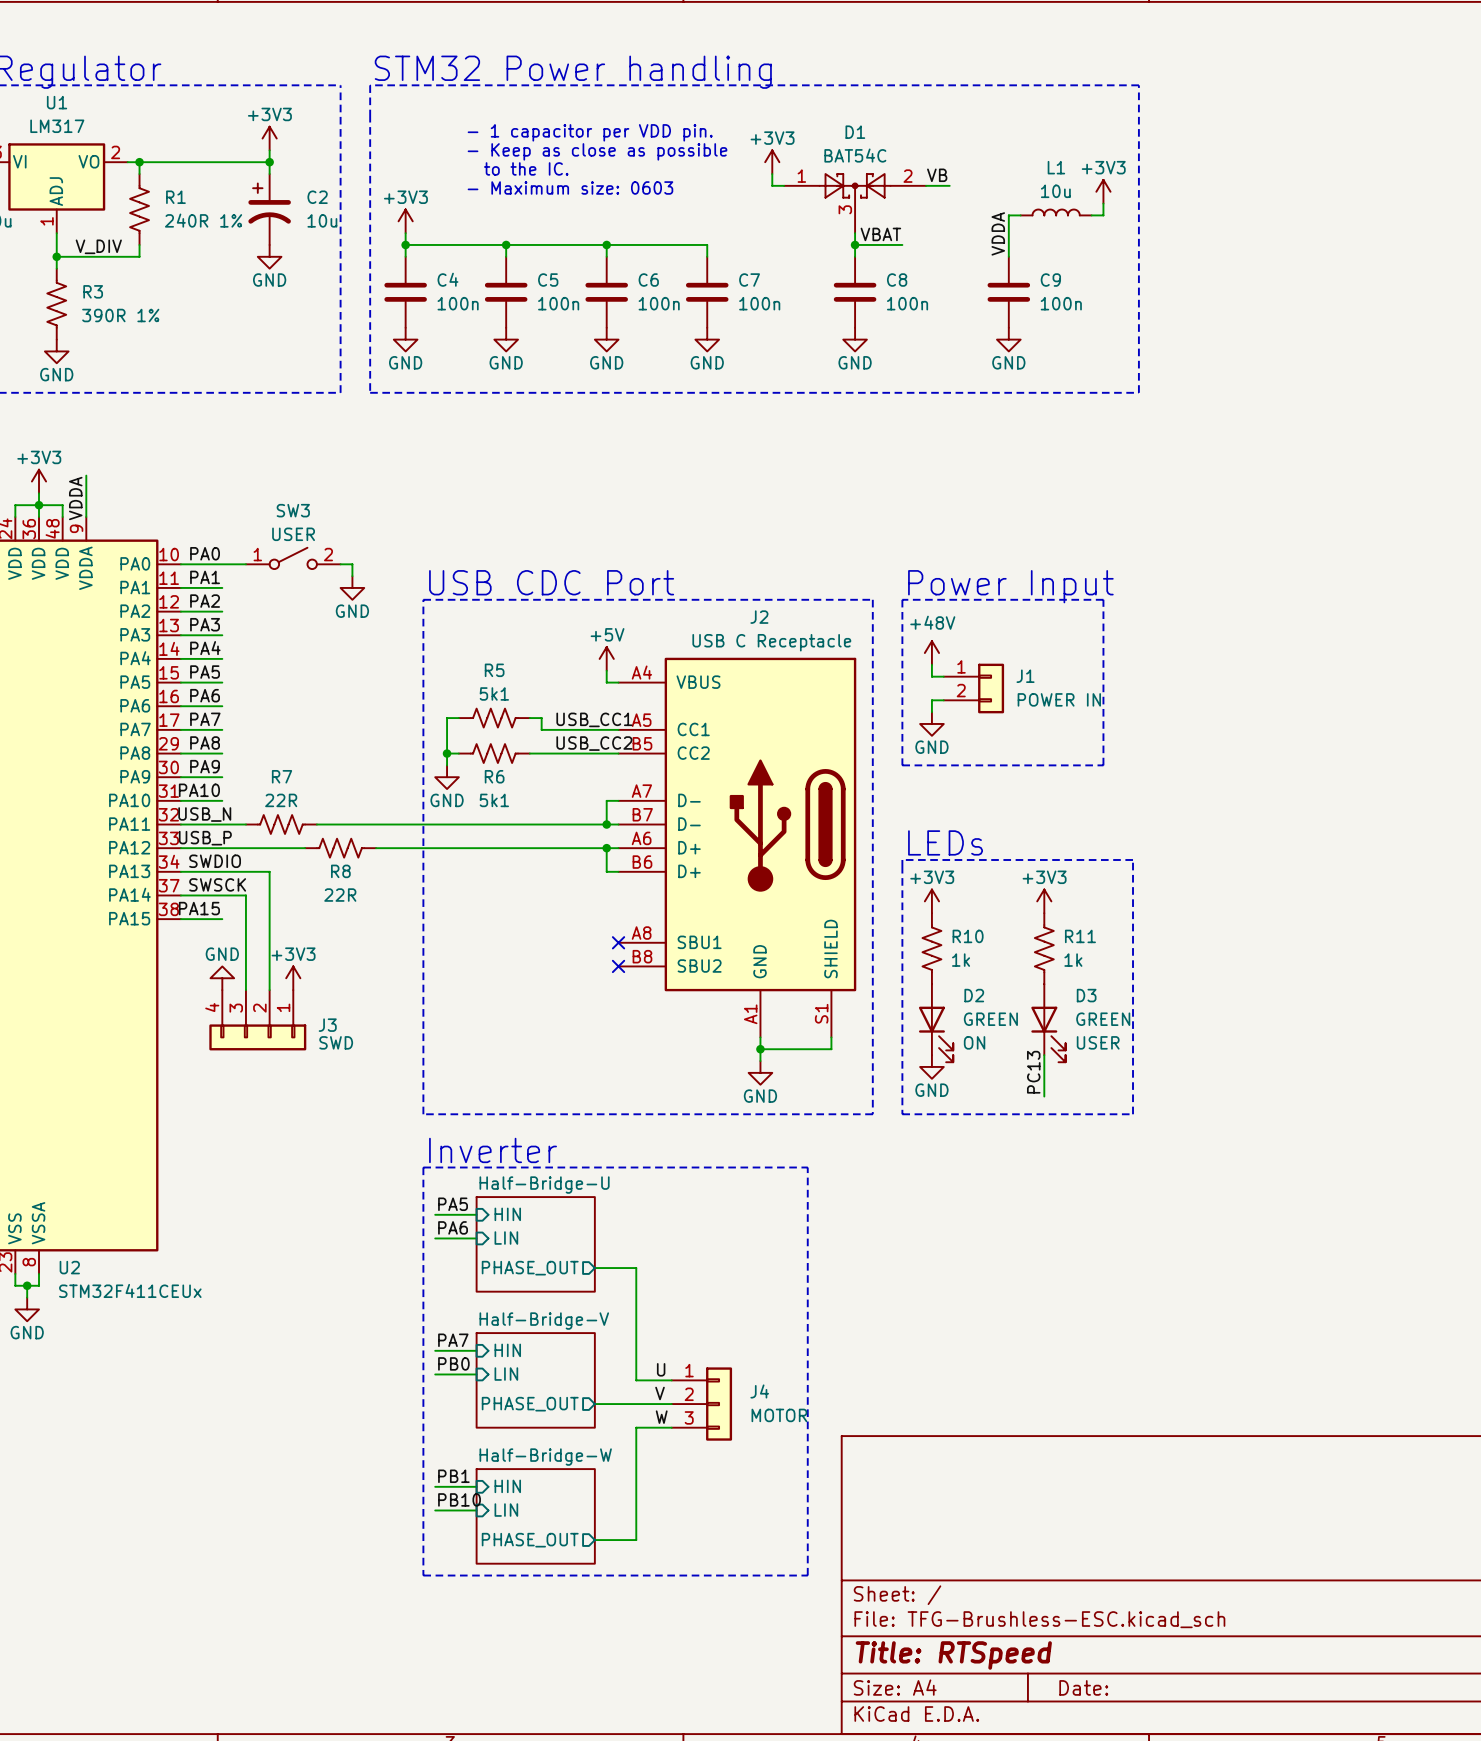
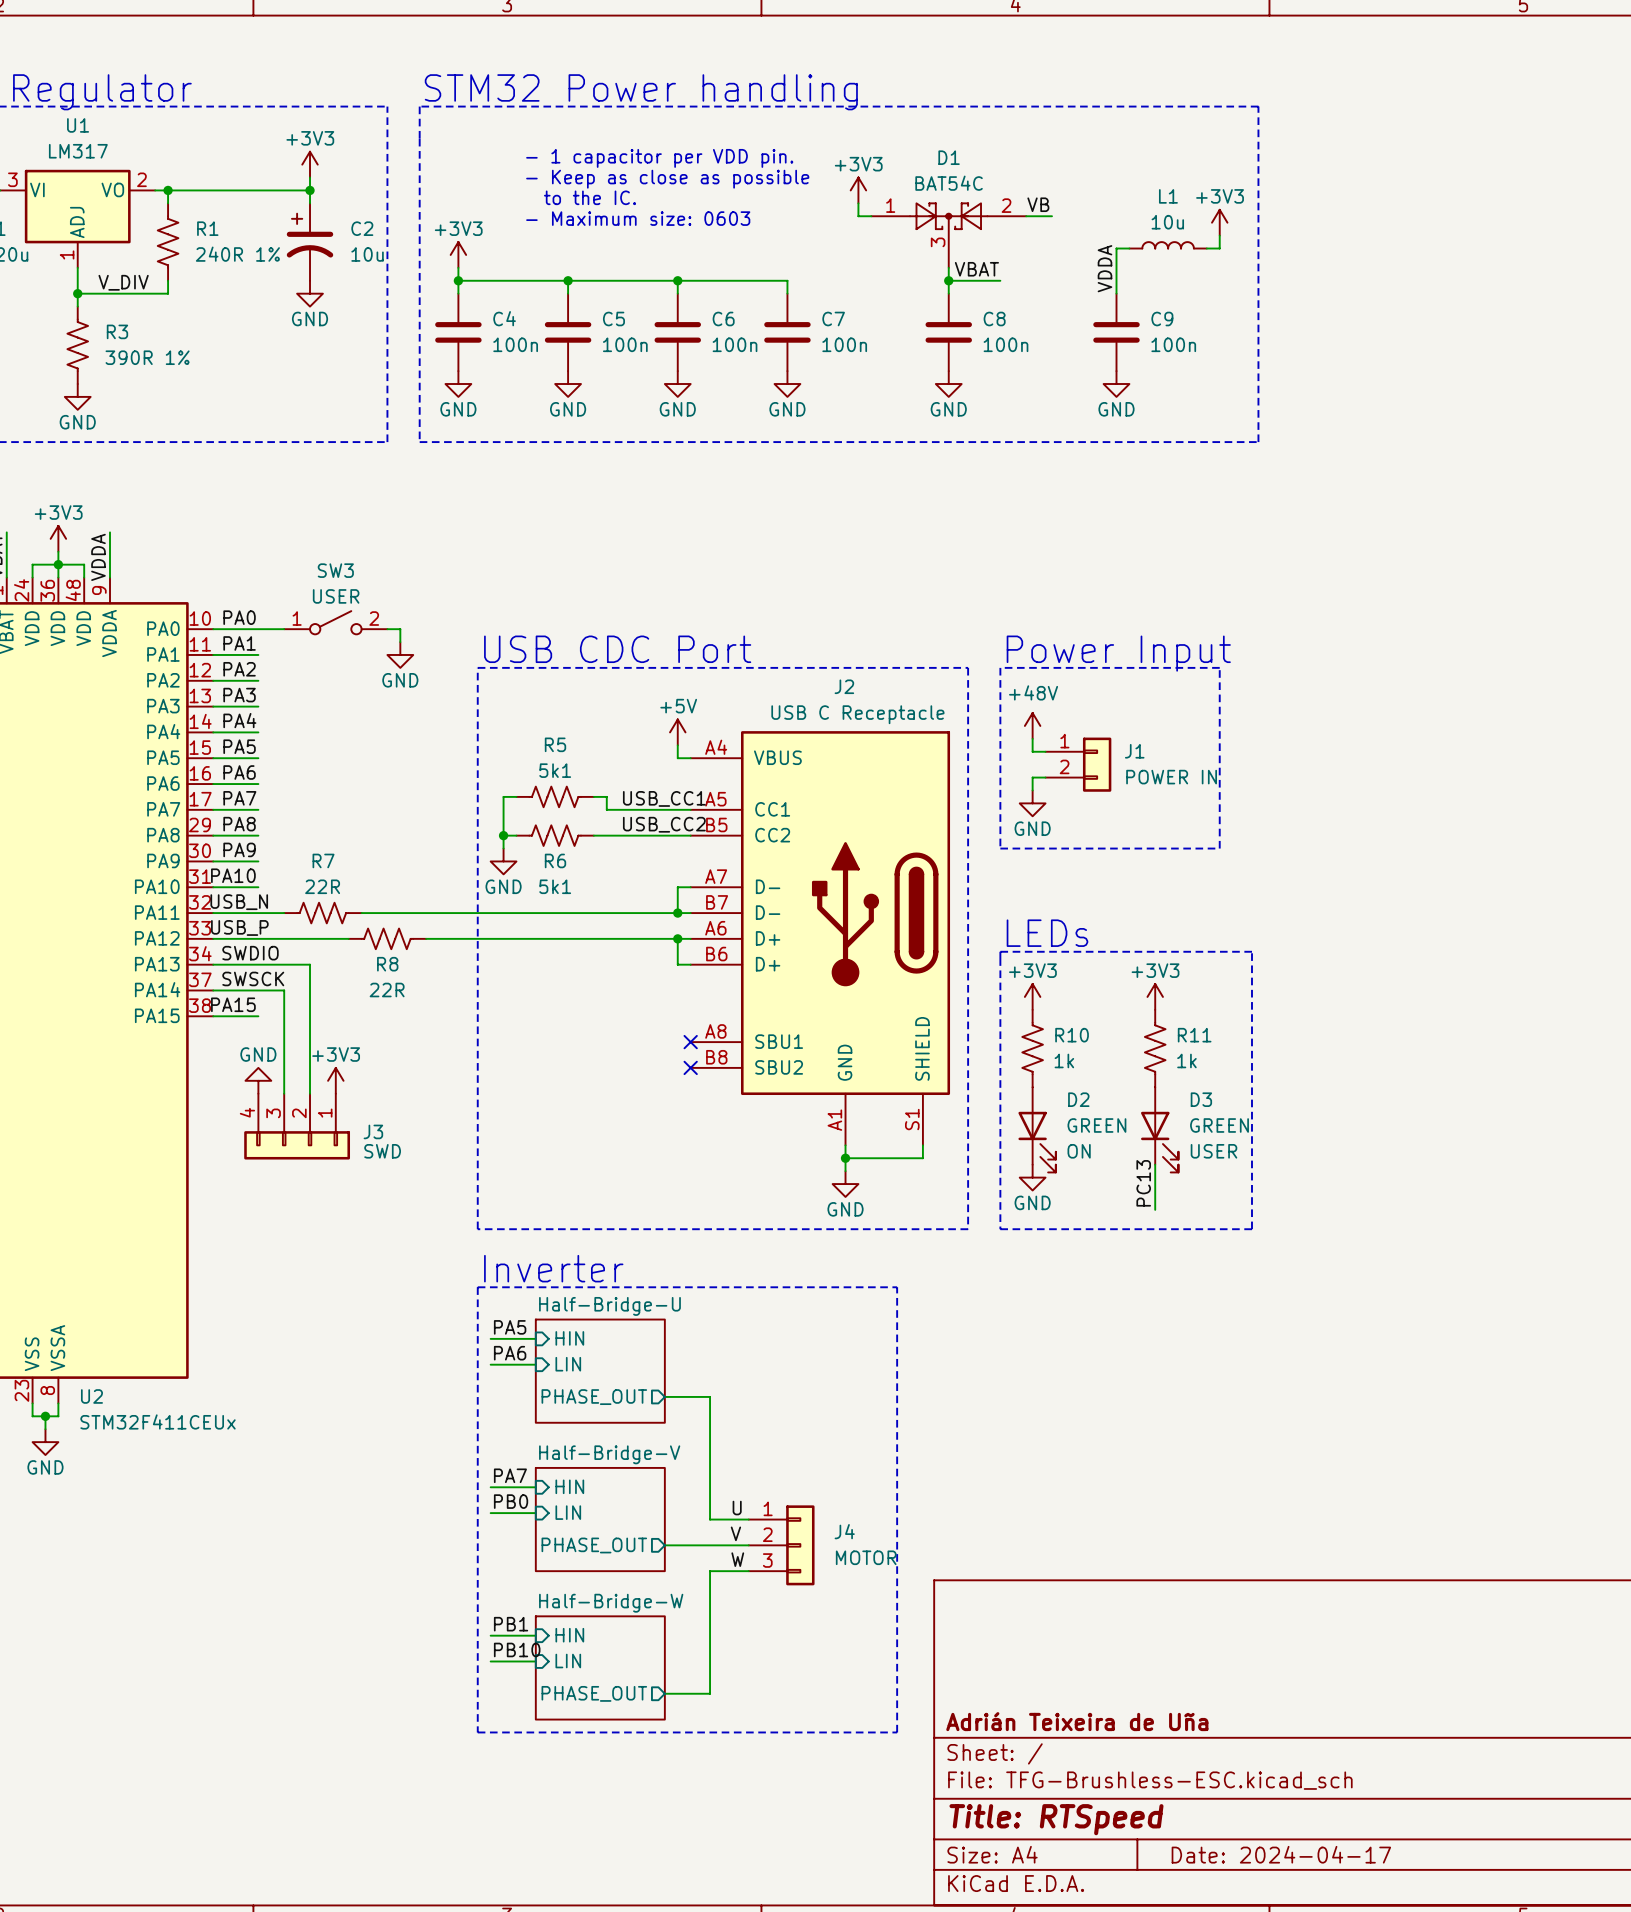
title block: none -> Adrián Teixeira de Uña (1077, 1721)
title block: Date: (1083, 1687) -> Date: 2024-04-17 (1281, 1854)

